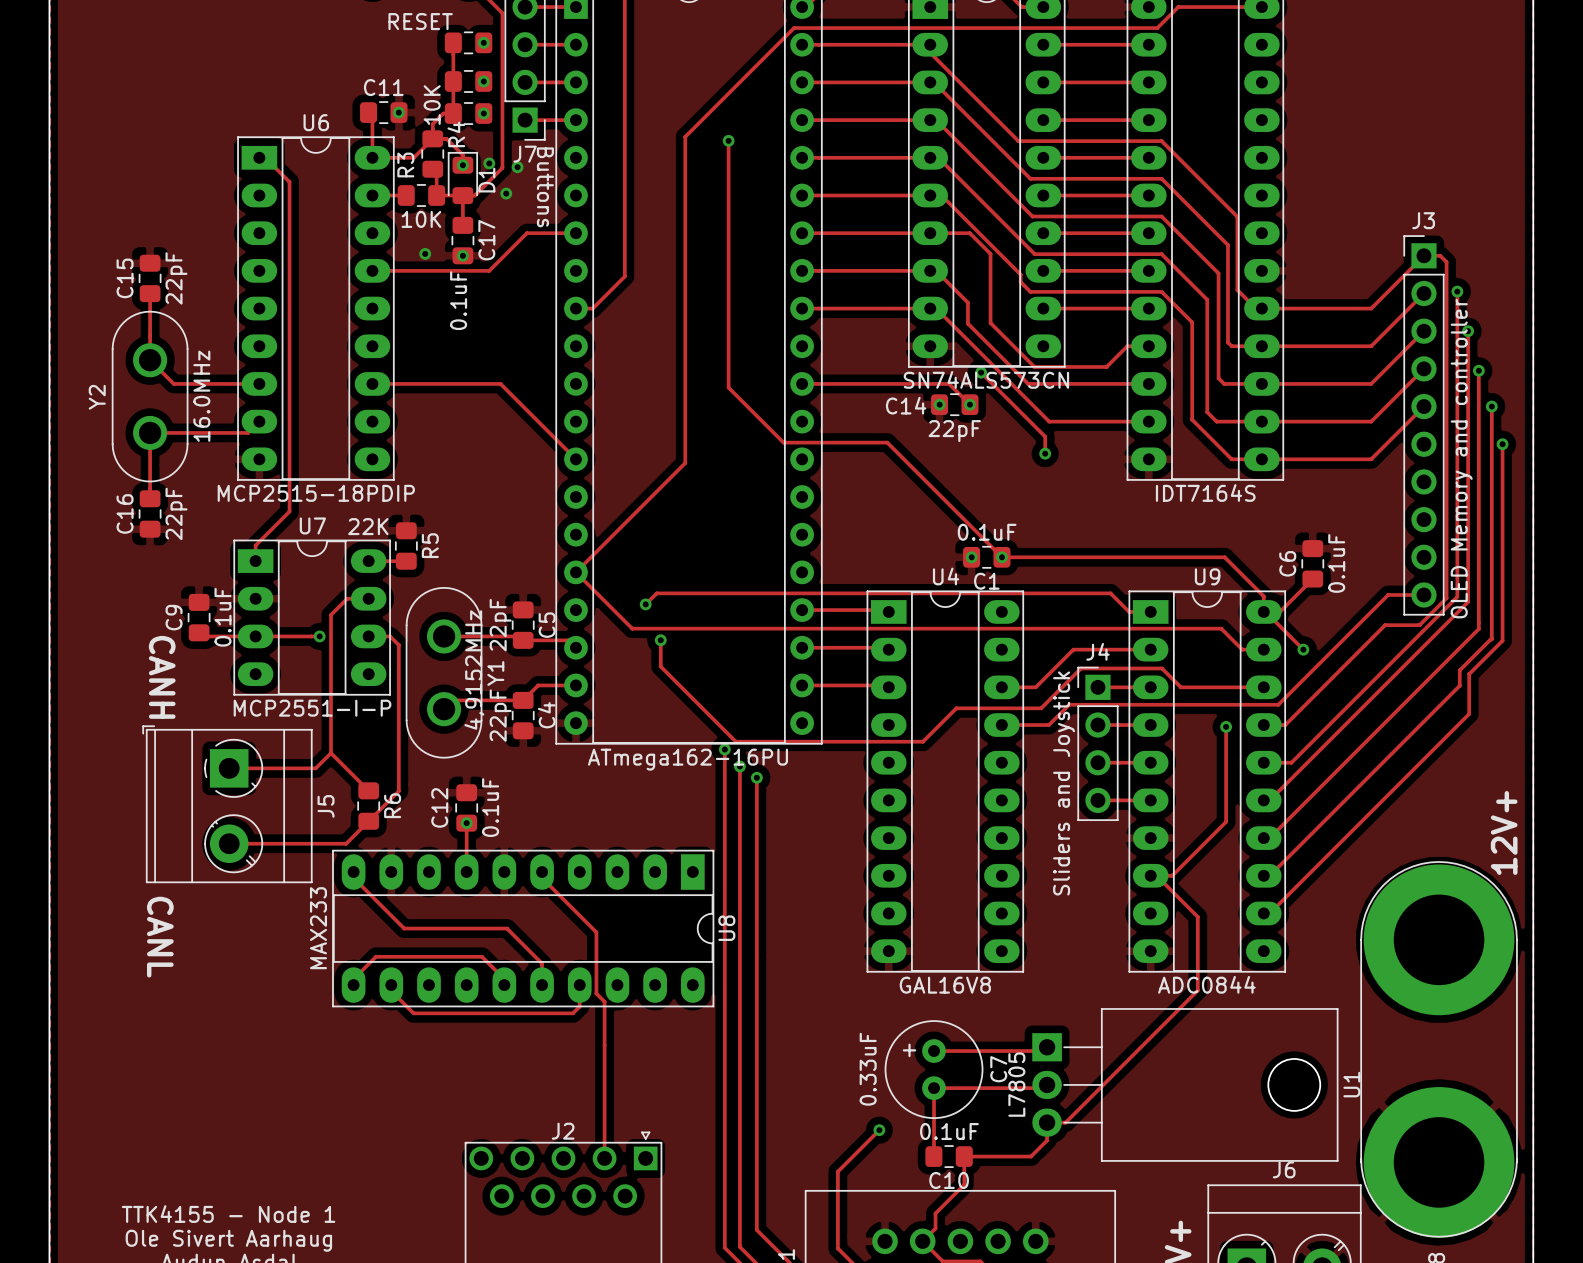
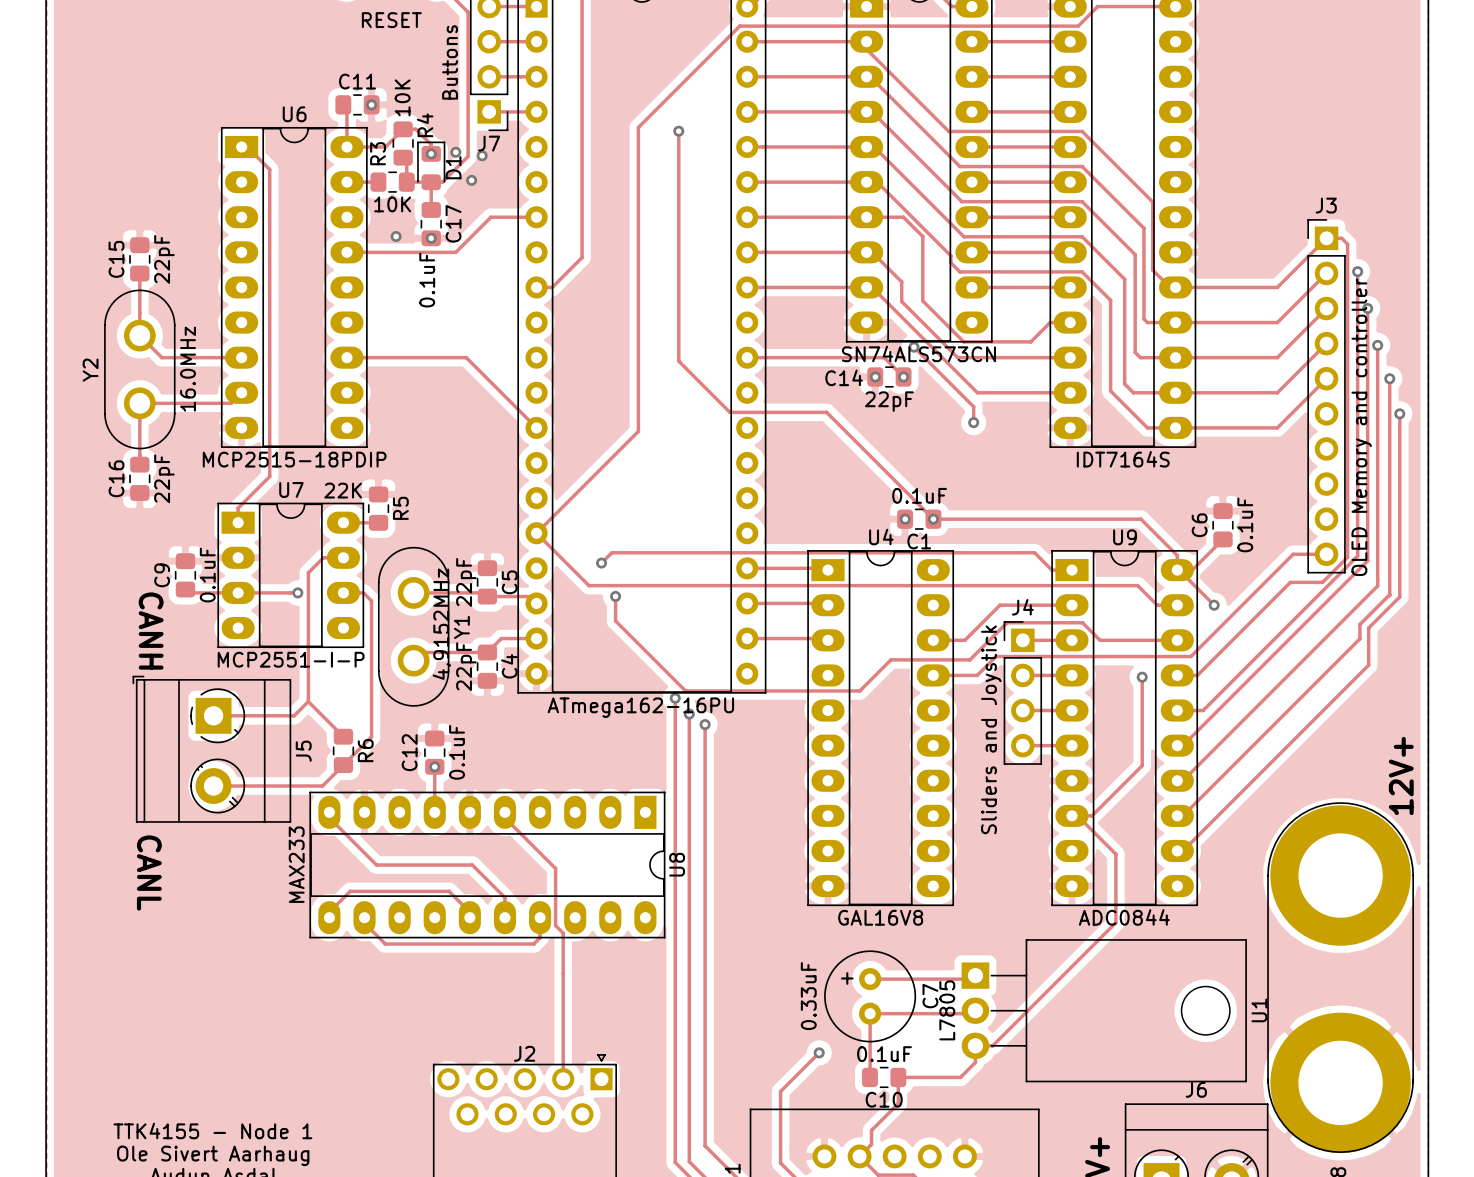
track: (453, 42) (453, 113) (443, 113) (432, 124) (432, 138) -> none
part: (468, 42) -> none
via: (483, 42) -> none
part: (468, 81) -> none
via: (483, 81) -> none
part: (468, 113) -> none
via: (483, 113) -> none
text rotation: 0° (545, 187) -> 180° (450, 62)
text position: Buttons (545, 187) -> Buttons (450, 62)

